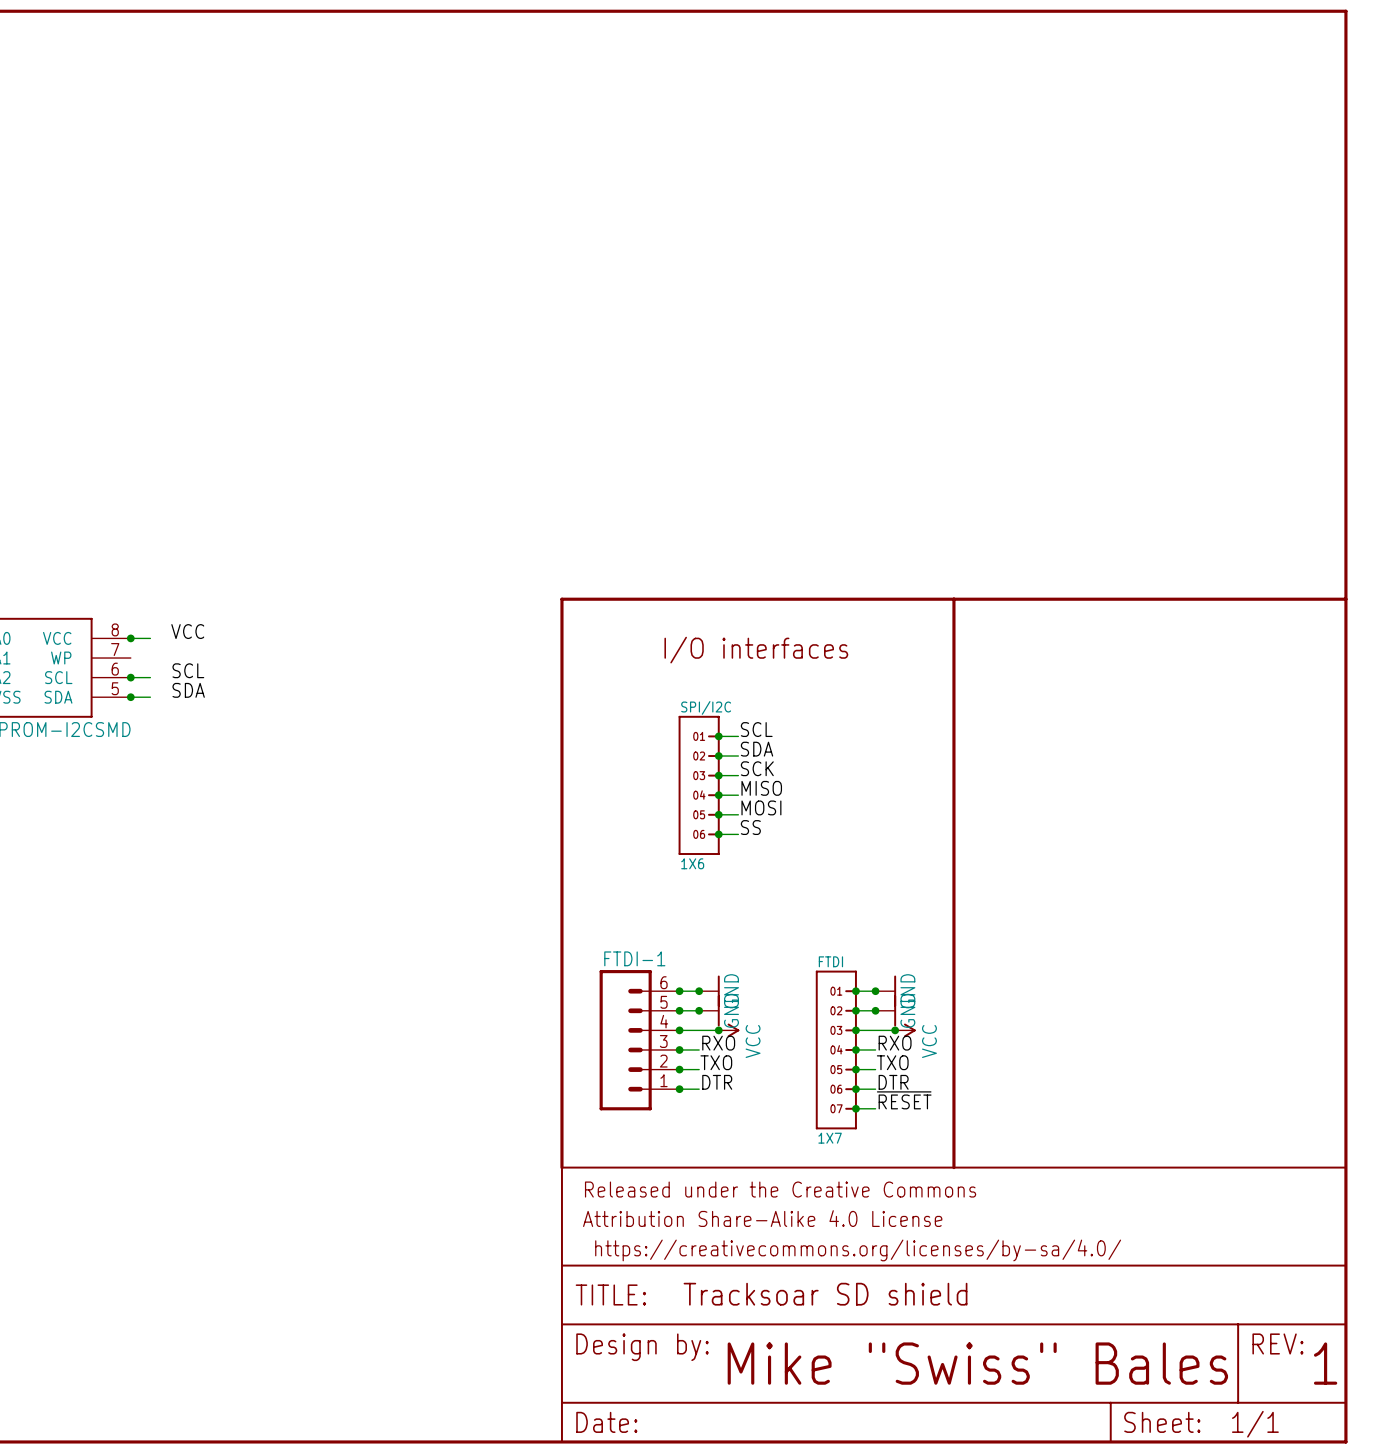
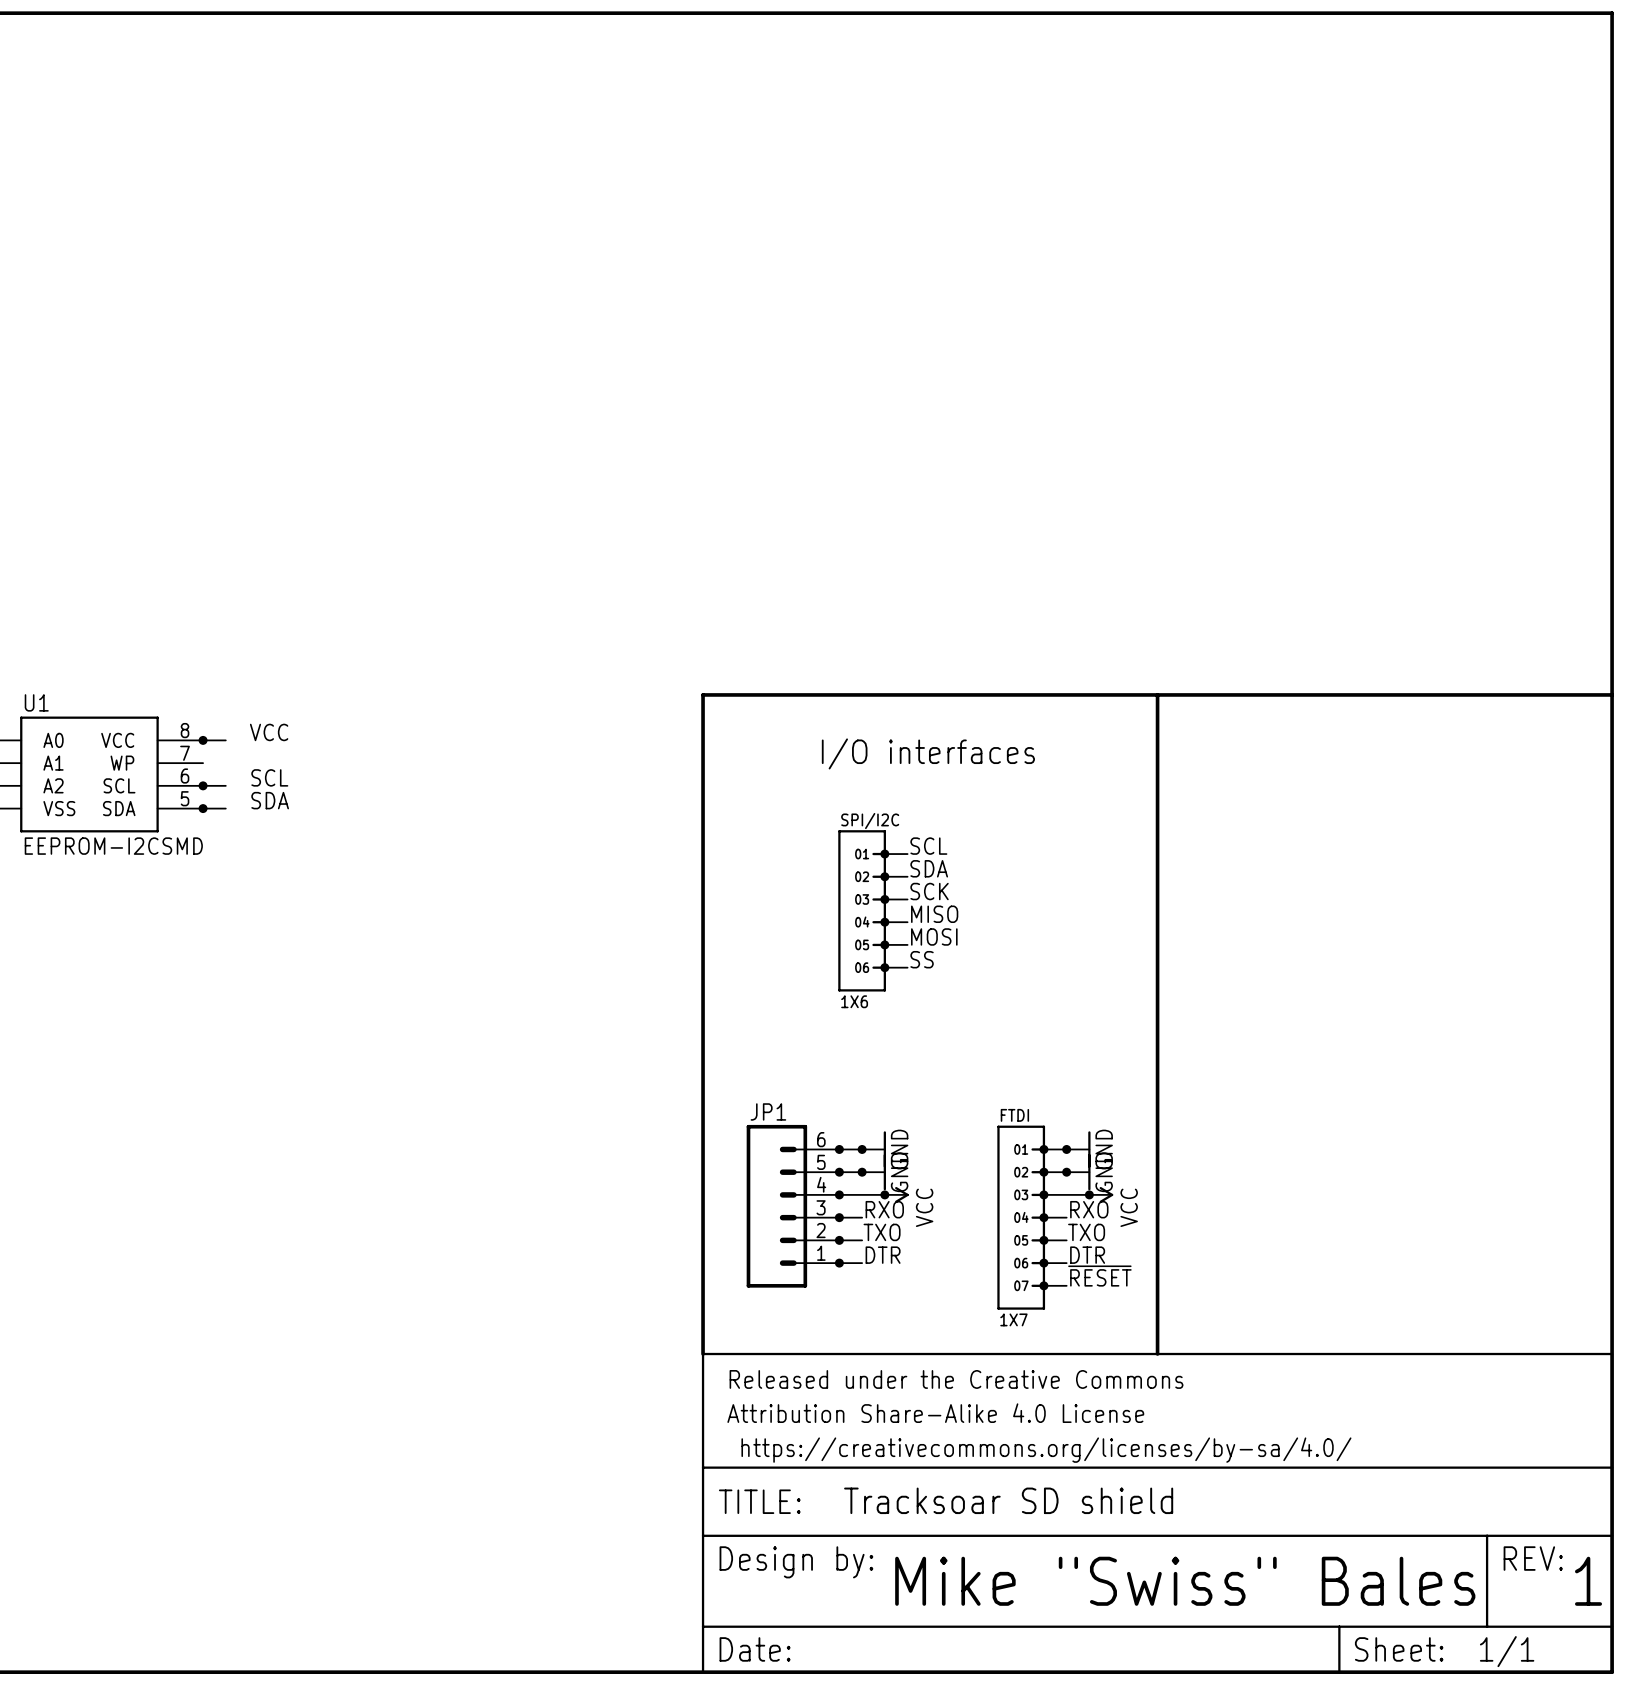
FTDI-1 name: FTDI-1 (634, 958) -> JP1 (768, 1111)

